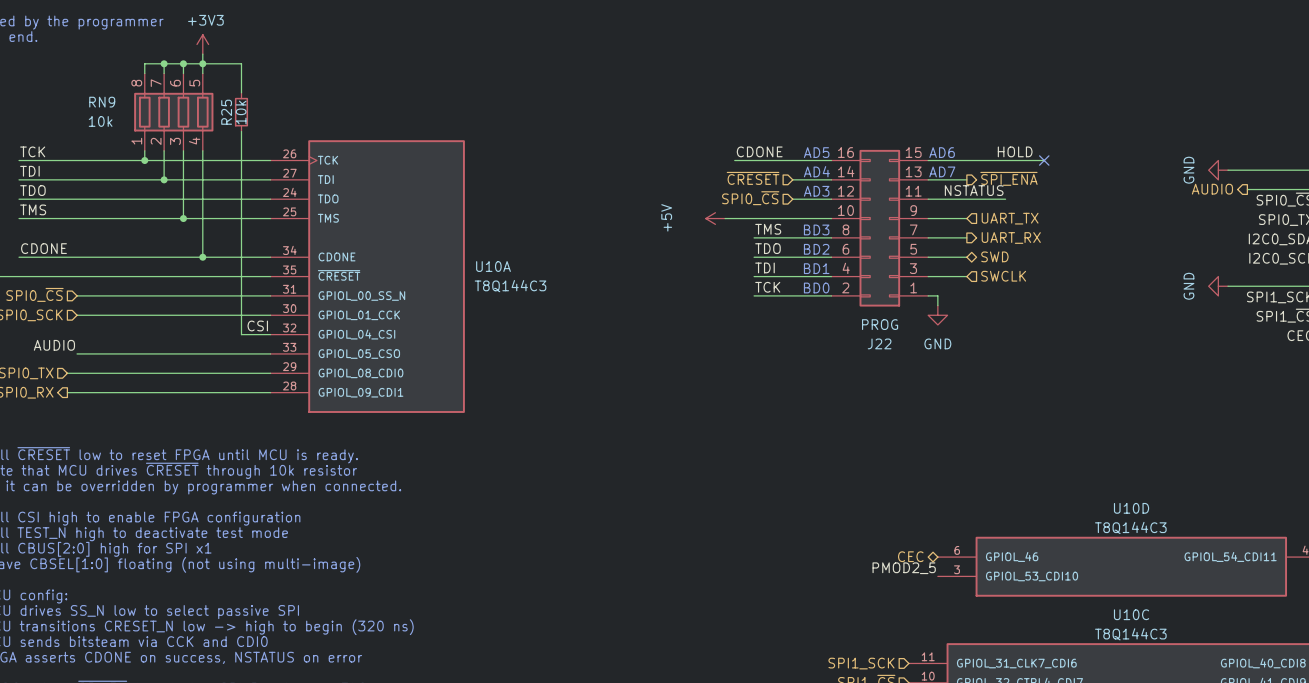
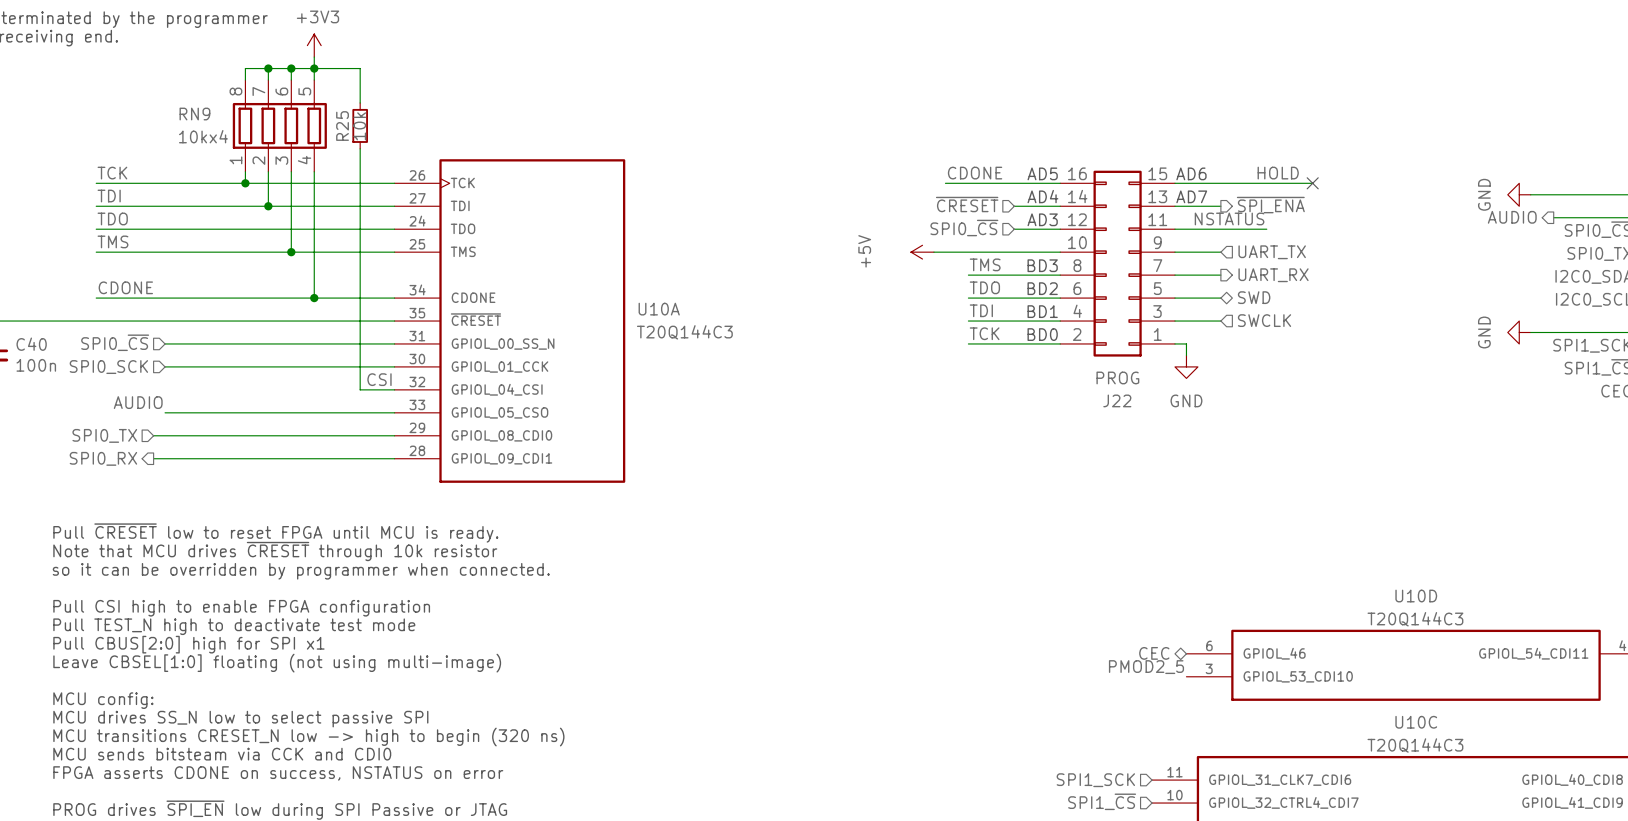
RN9 value: 10k (100, 121) -> 10kx4 (203, 136)
U10A value: T8Q144C3 (510, 286) -> T20Q144C3 (684, 332)
U10D value: T8Q144C3 (1130, 527) -> T20Q144C3 (1415, 619)
U10C value: T8Q144C3 (1130, 634) -> T20Q144C3 (1415, 745)

